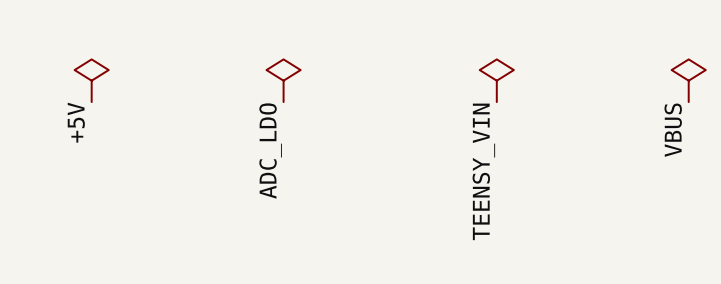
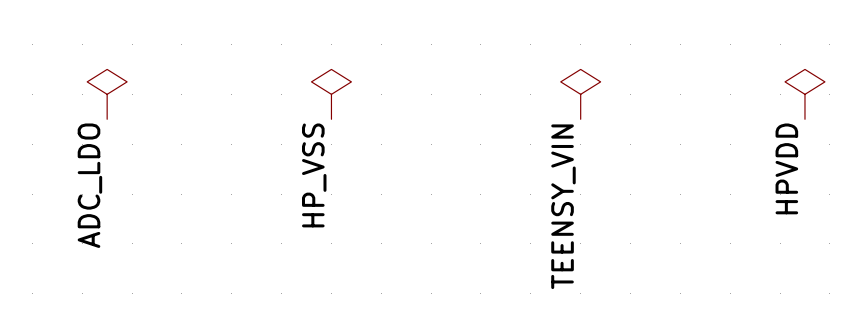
label: +5V (76, 122) -> ADC_LDO (89, 185)
label: VBUS (673, 130) -> HPVDD (786, 168)
label: ADC_LDO (270, 151) -> HP_VSS (314, 175)

